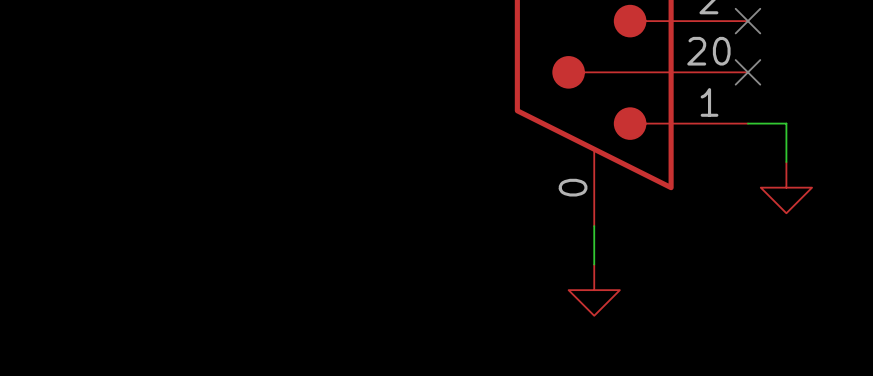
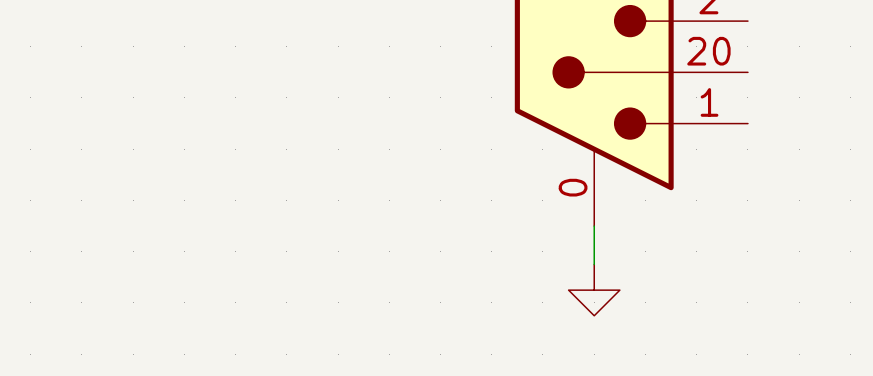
no-connect mark: (747, 21) -> none
no-connect mark: (747, 72) -> none
wire: (747, 123) (786, 123) (786, 162) -> none
power symbol: (786, 187) -> none

